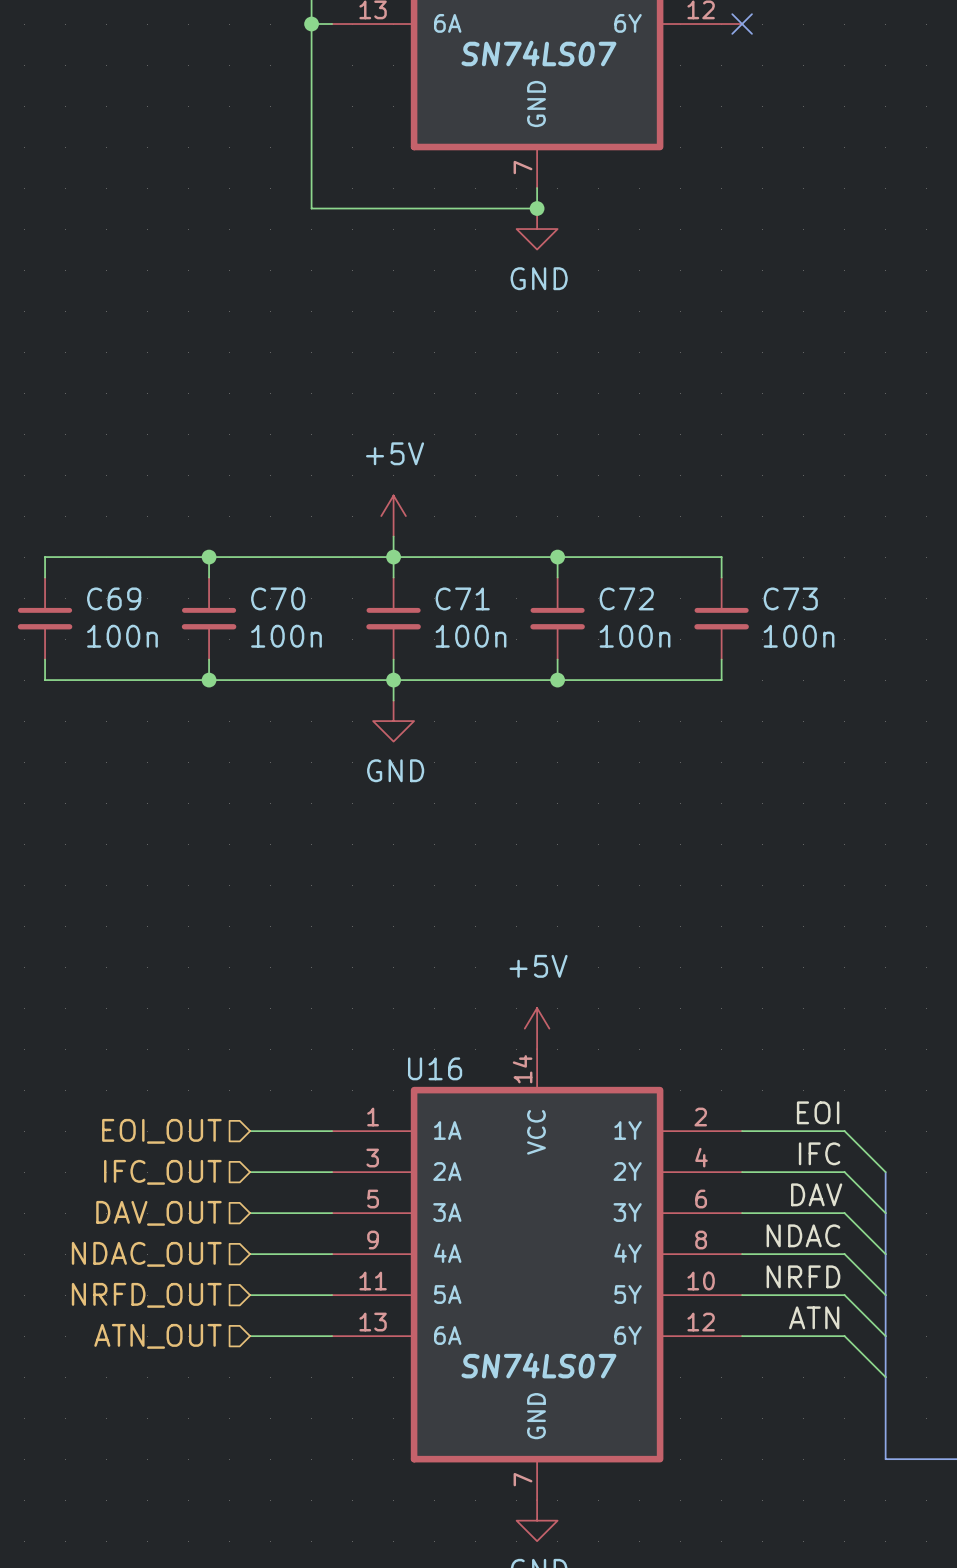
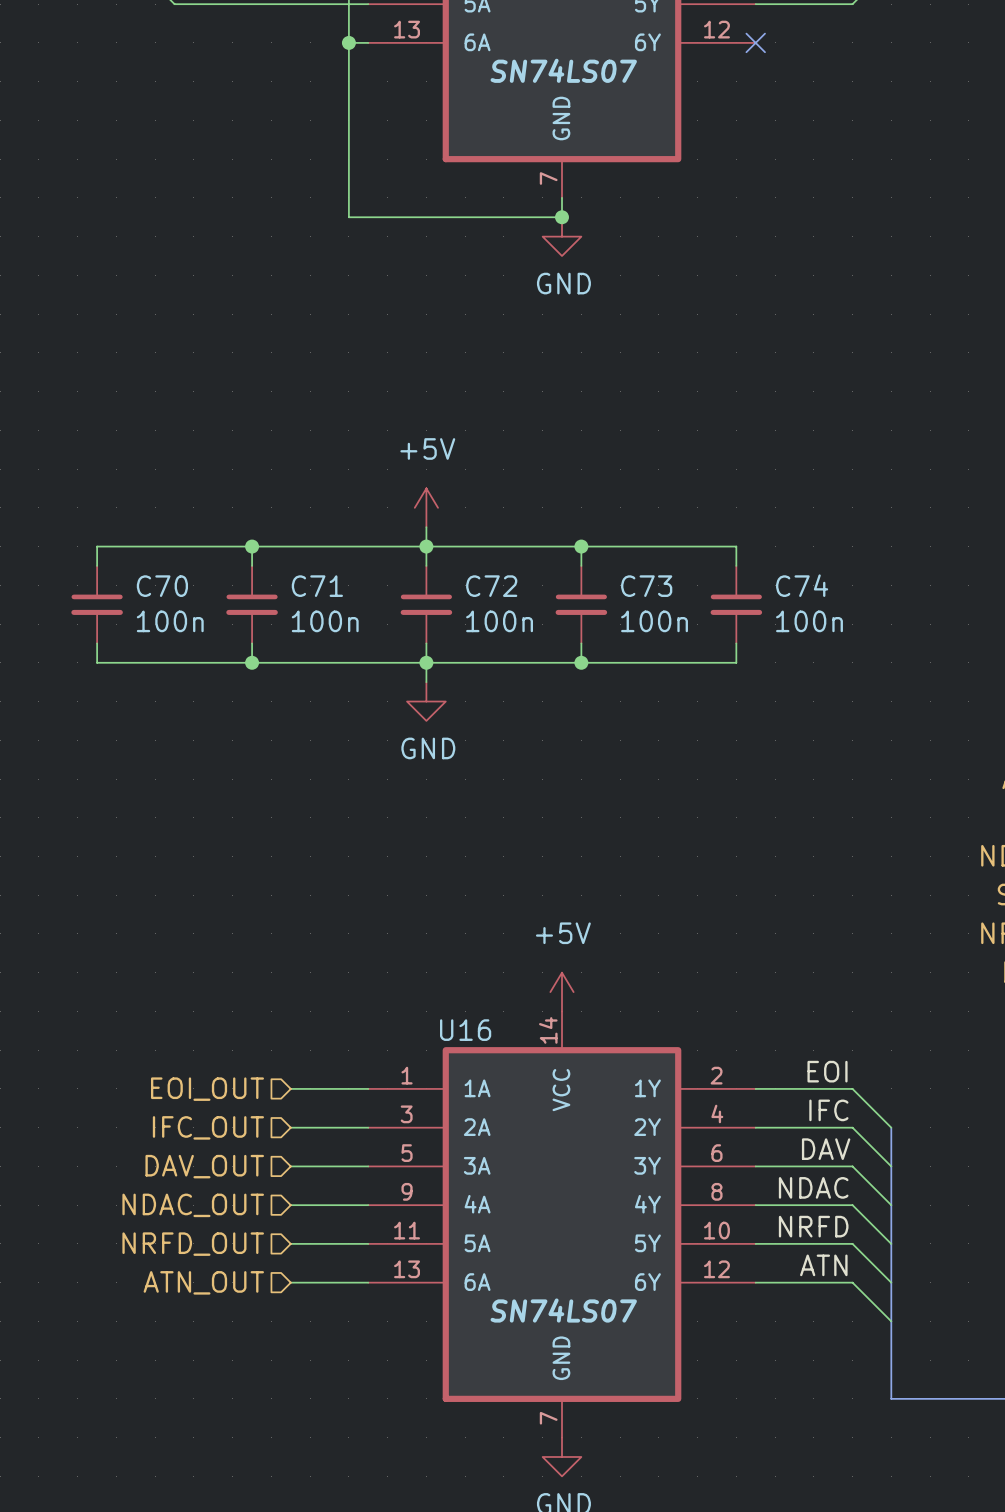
C69 name: C69 (114, 598) -> C70 (162, 586)
C70 name: C70 (278, 598) -> C71 (317, 586)
C71 name: C71 (462, 598) -> C72 (491, 586)
C72 name: C72 (626, 598) -> C73 (646, 586)
C73 name: C73 (790, 598) -> C74 (802, 585)

